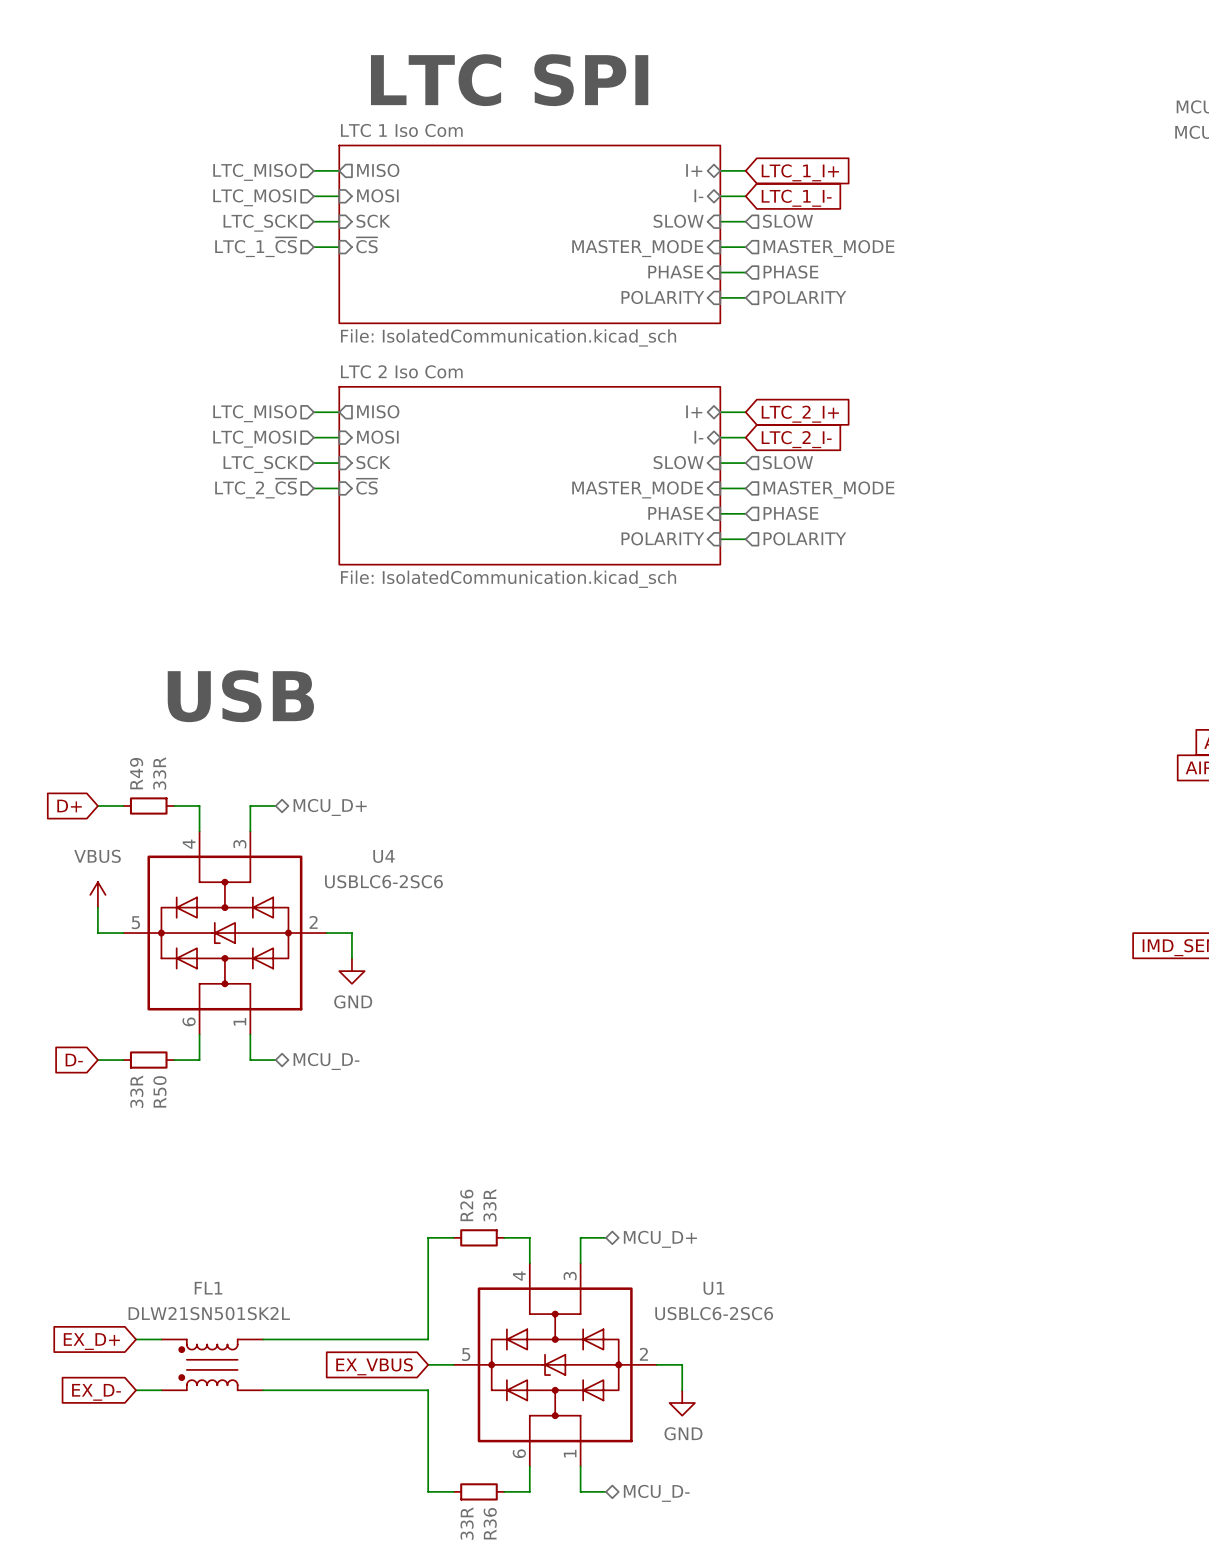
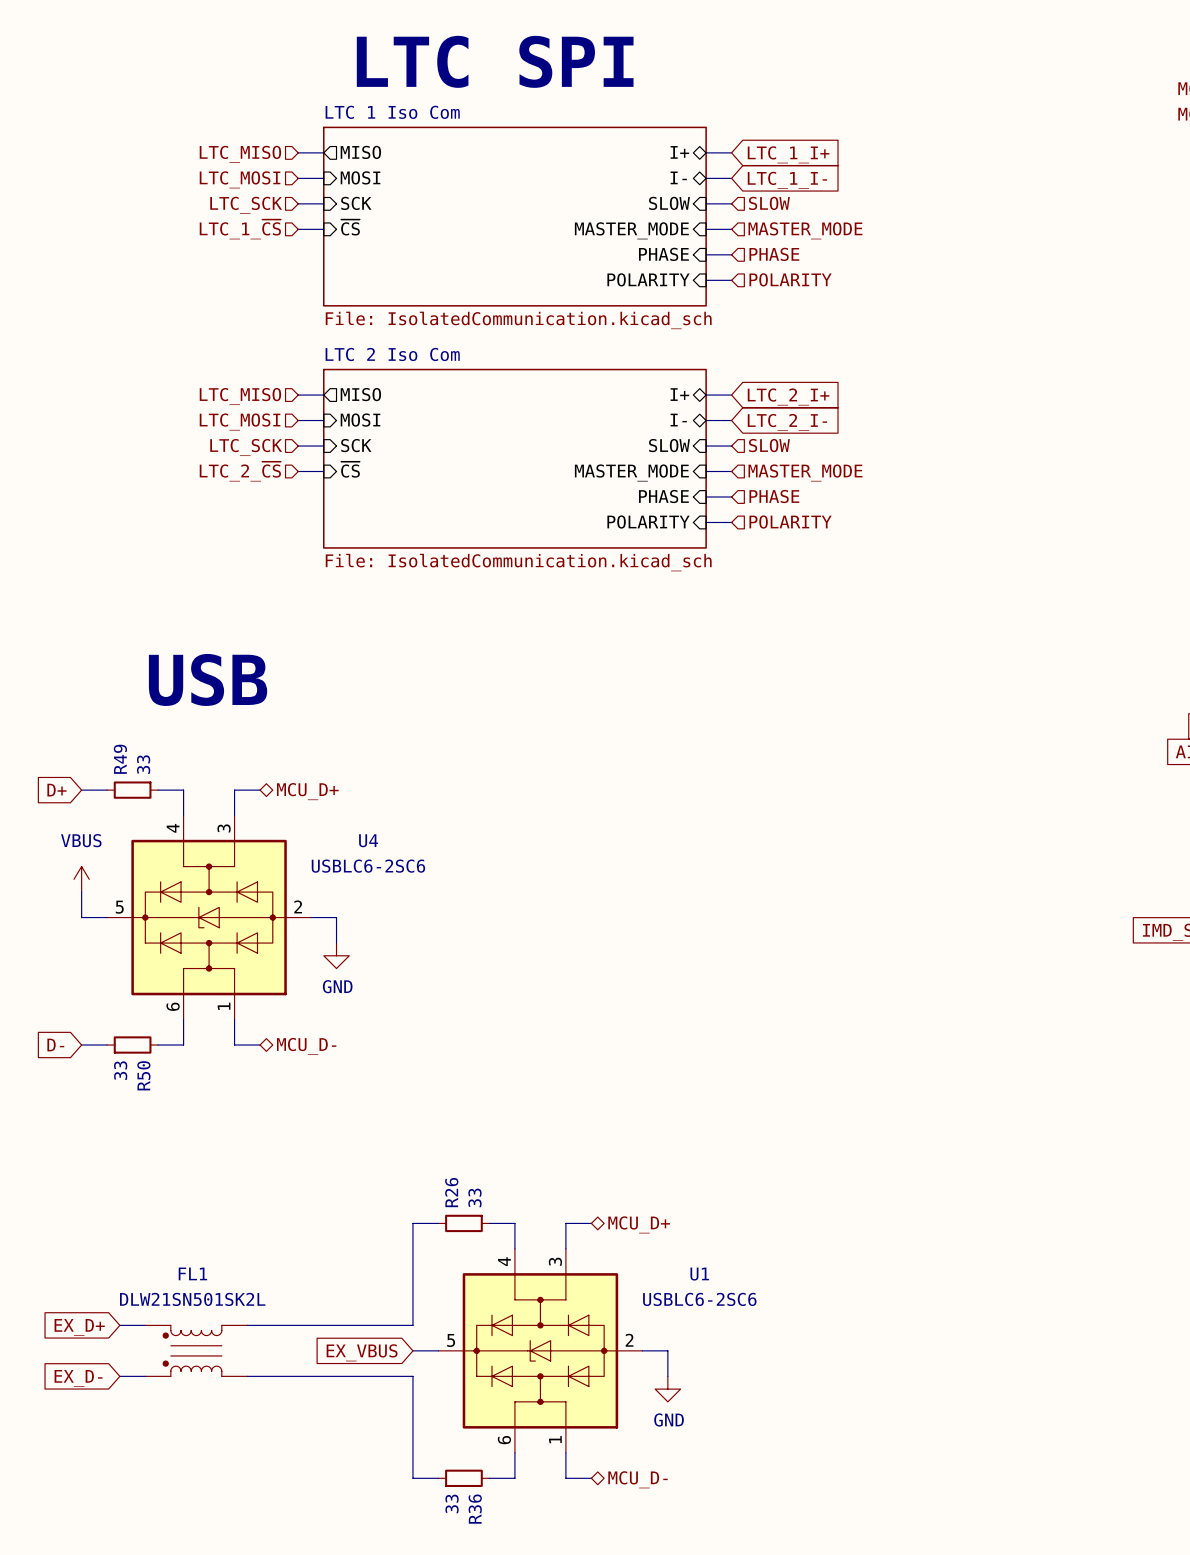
R49 value: 33R (159, 773) -> 33 (143, 764)
R50 value: 33R (136, 1091) -> 33 (120, 1070)
R26 value: 33R (489, 1205) -> 33 (474, 1197)
R36 value: 33R (467, 1523) -> 33 (452, 1503)

